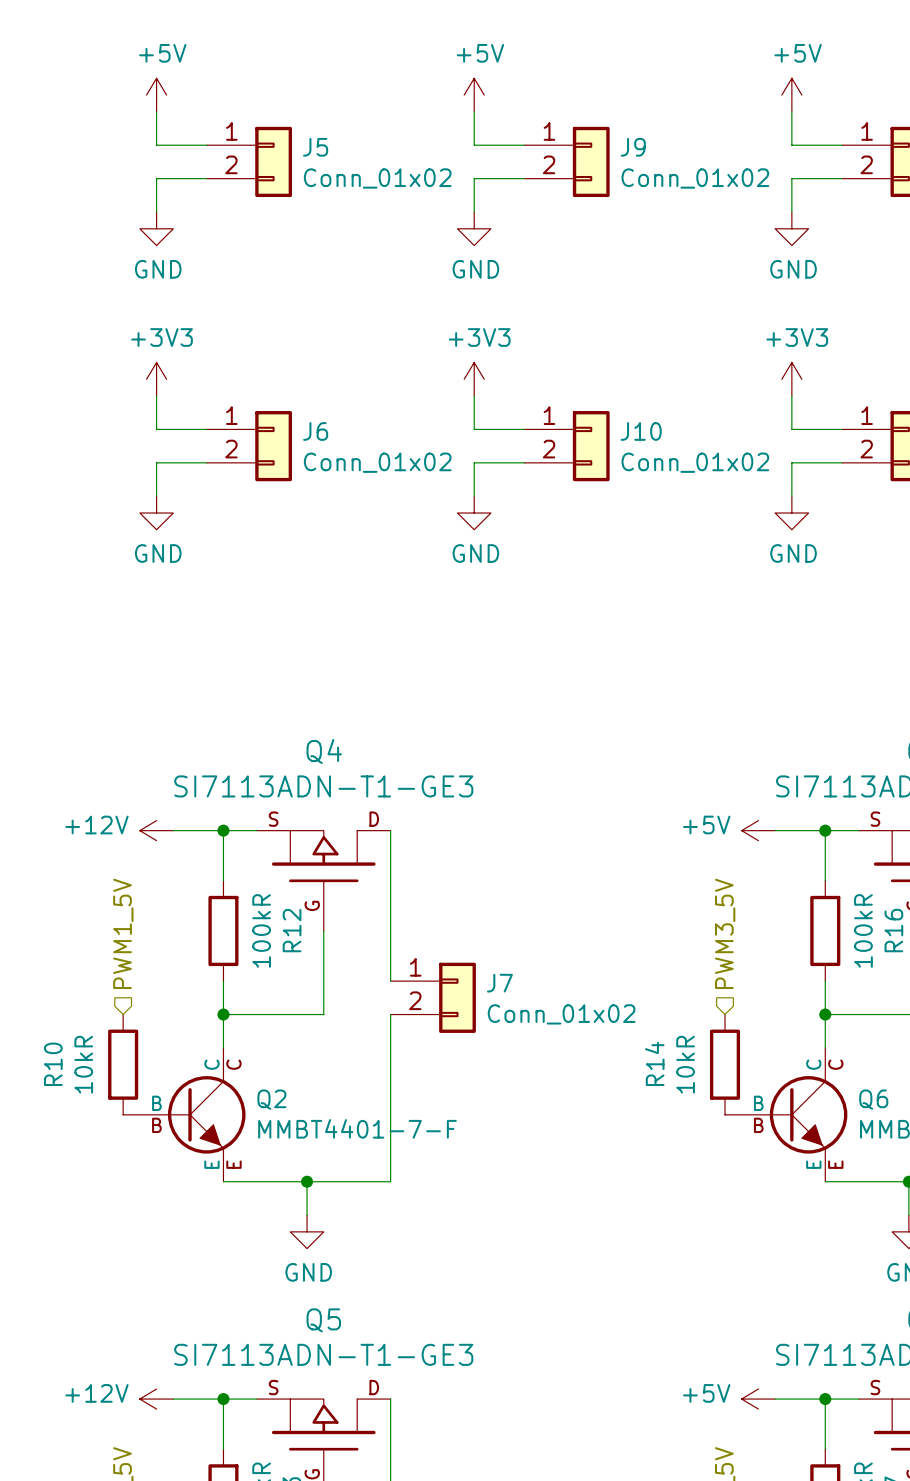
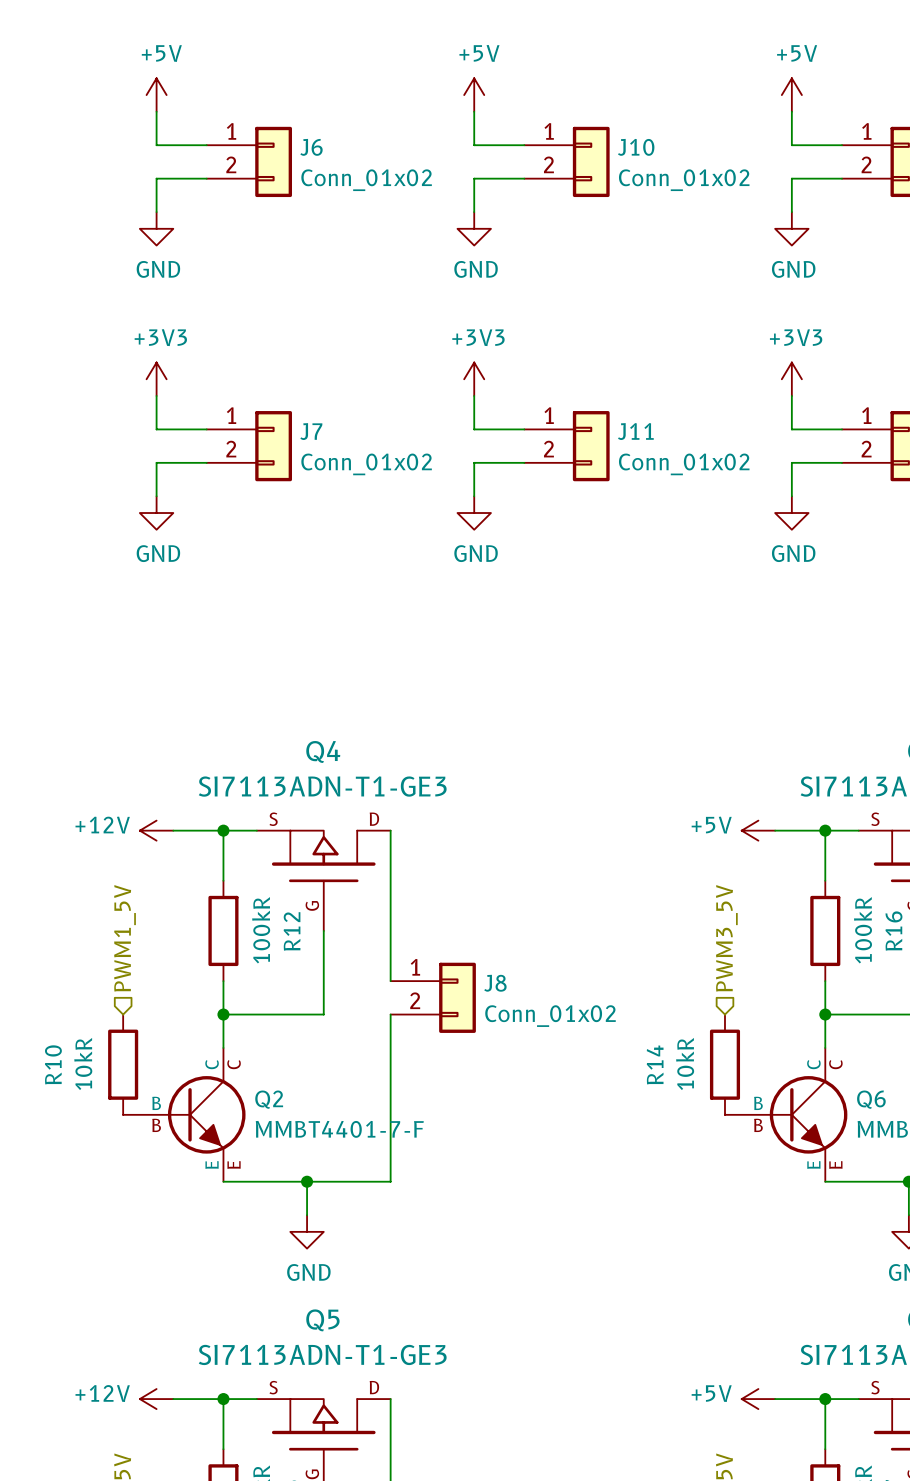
J5 name: J5 (315, 147) -> J6 (311, 147)
J9 name: J9 (633, 147) -> J10 (636, 147)
J6 name: J6 (315, 431) -> J7 (311, 431)
J10 name: J10 (641, 431) -> J11 (635, 431)
J7 name: J7 (499, 983) -> J8 (495, 983)

